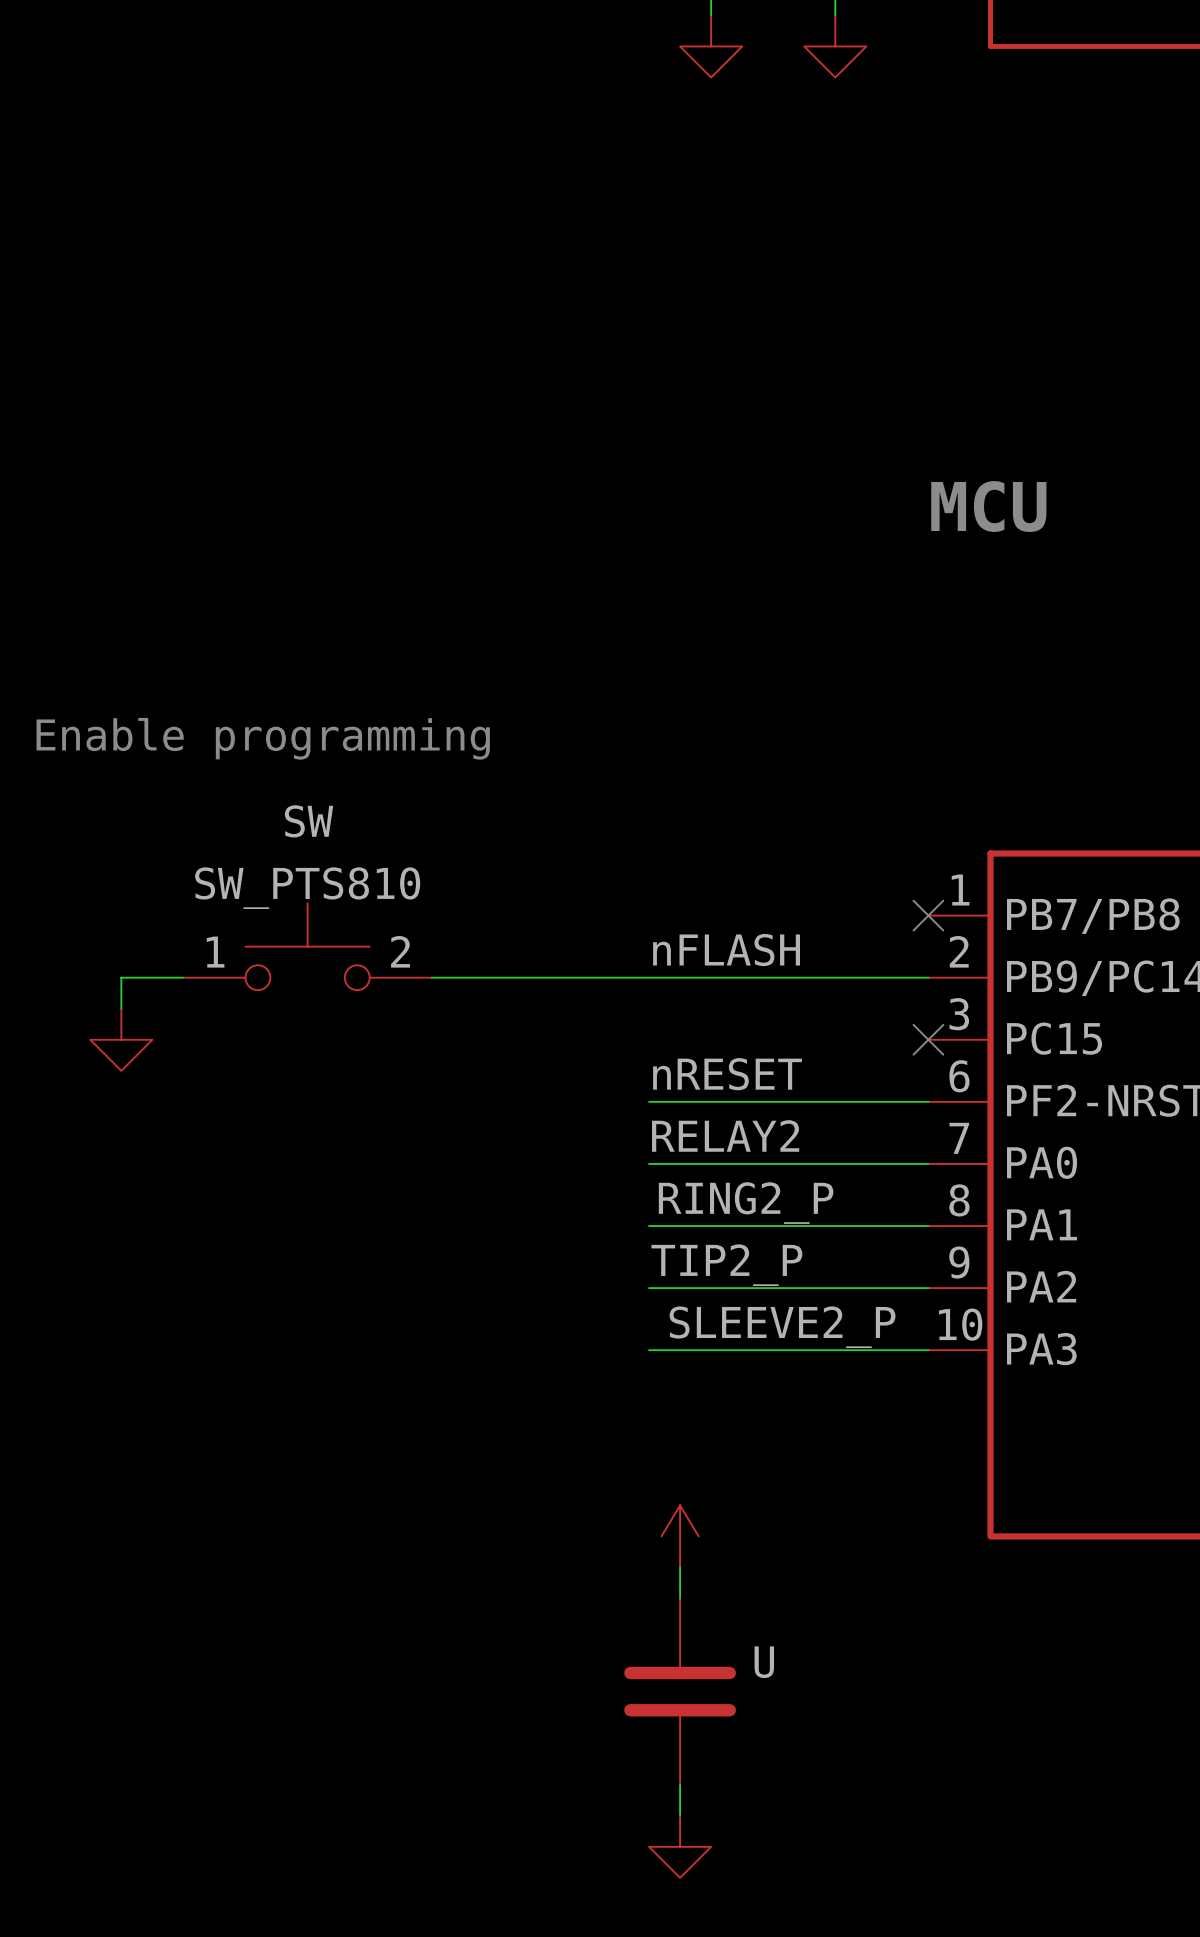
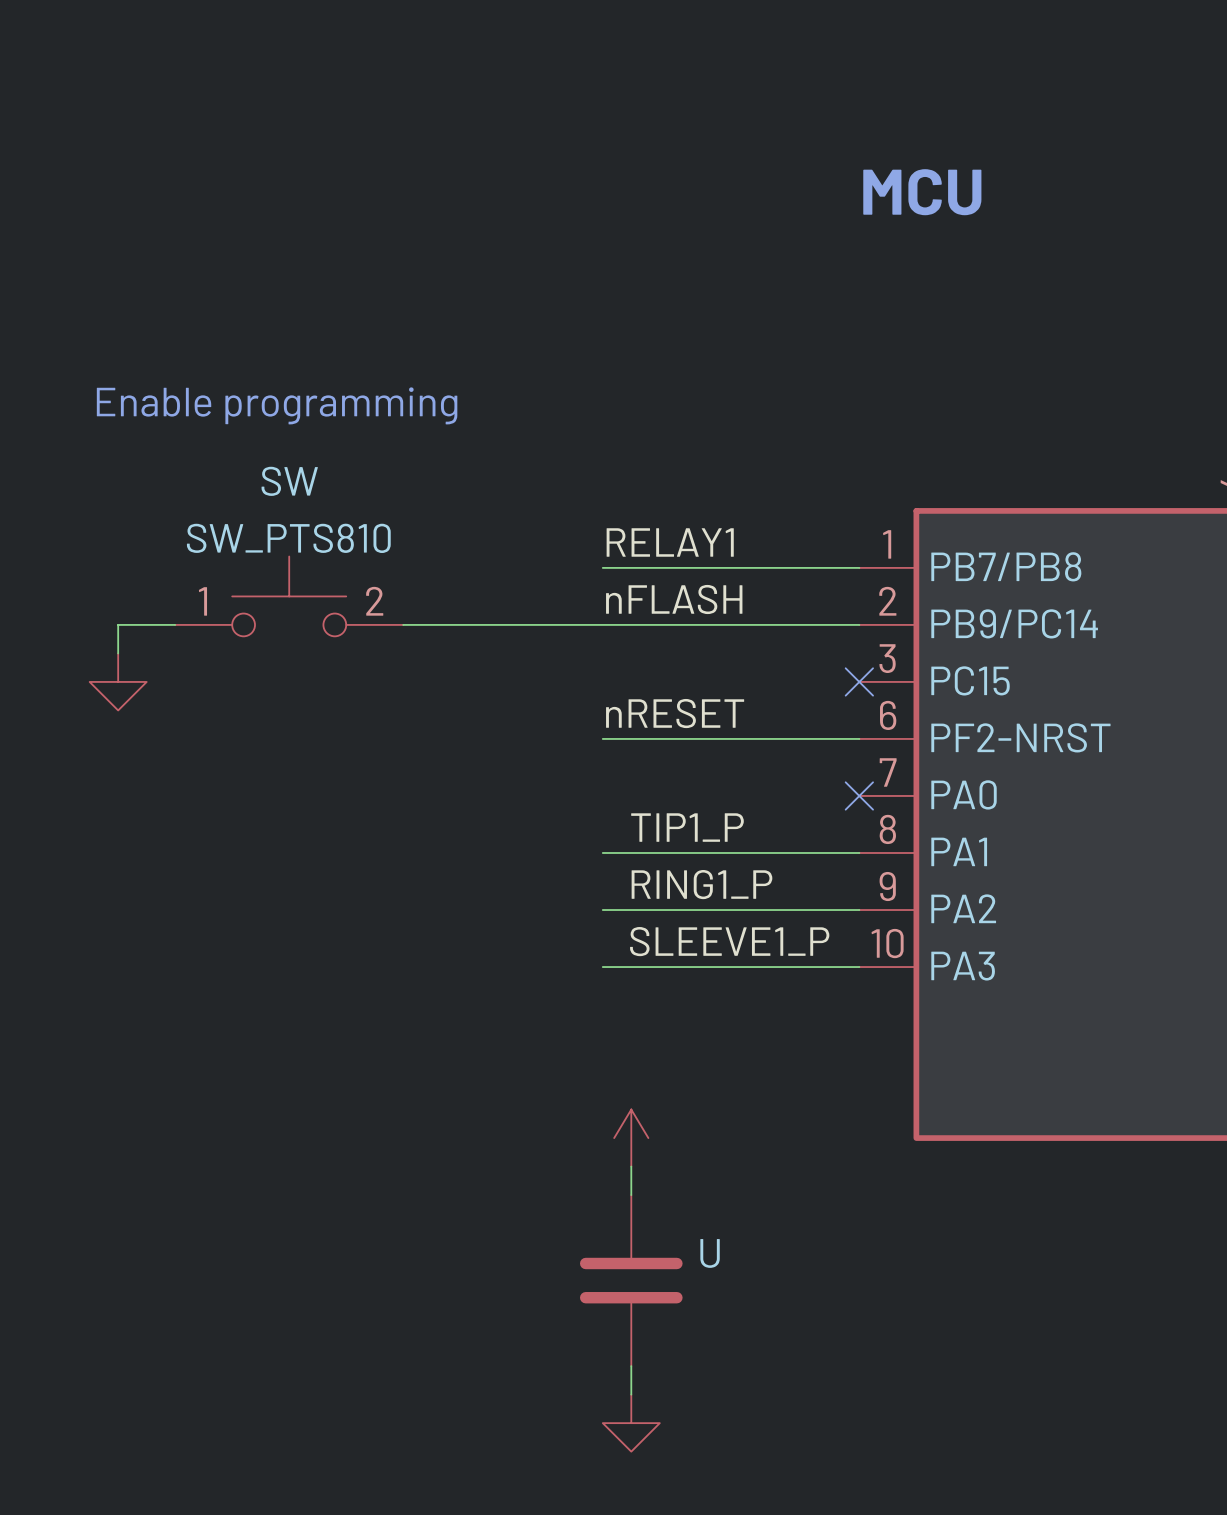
label: none -> RELAY1 (670, 542)
no-connect mark: (928, 915) -> none
label: RELAY2 (725, 1135) -> none
wire: (649, 1163) (928, 1163) -> (602, 567) (859, 567)
no-connect mark: none -> (859, 795)
label: RING2_P (746, 1203) -> RING1_P (701, 884)
label: TIP2_P (726, 1265) -> TIP1_P (687, 827)
label: SLEEVE2_P (782, 1327) -> SLEEVE1_P (729, 941)

